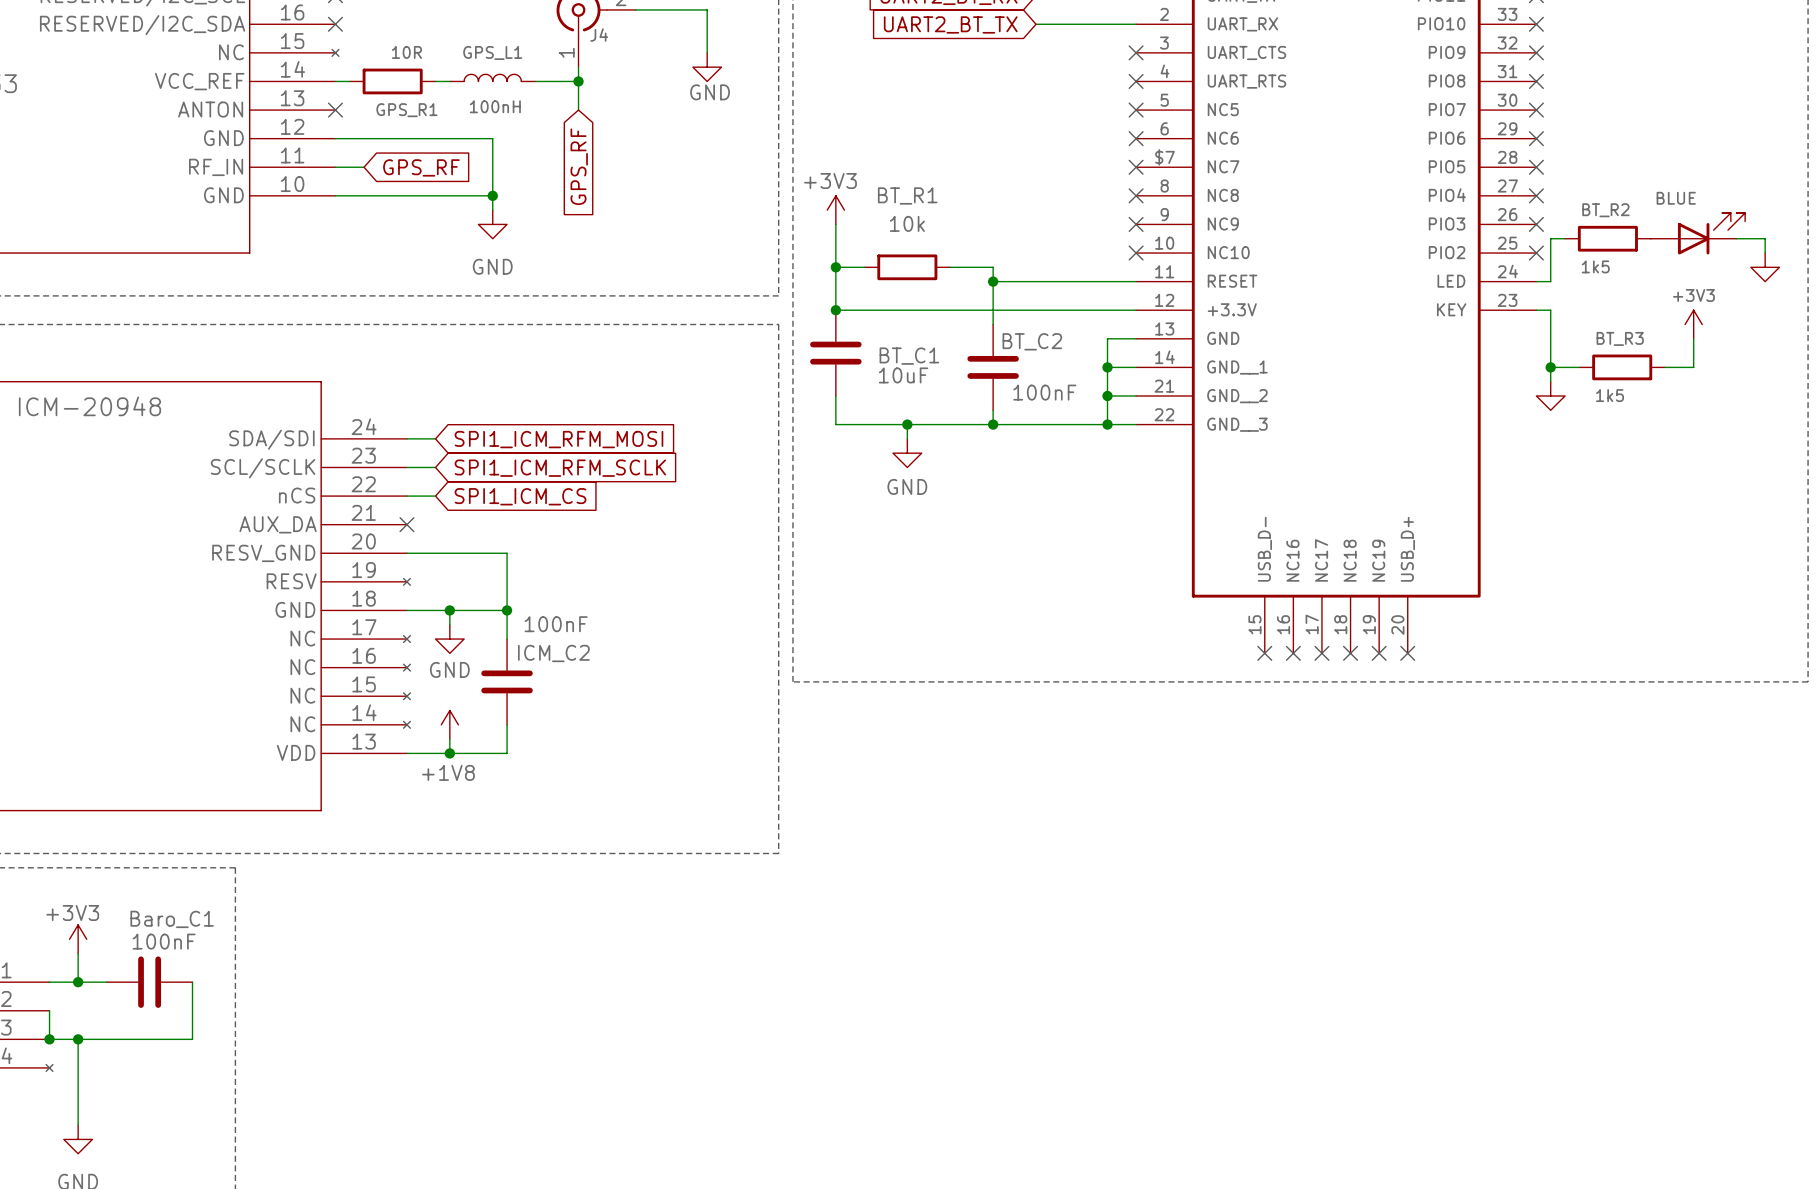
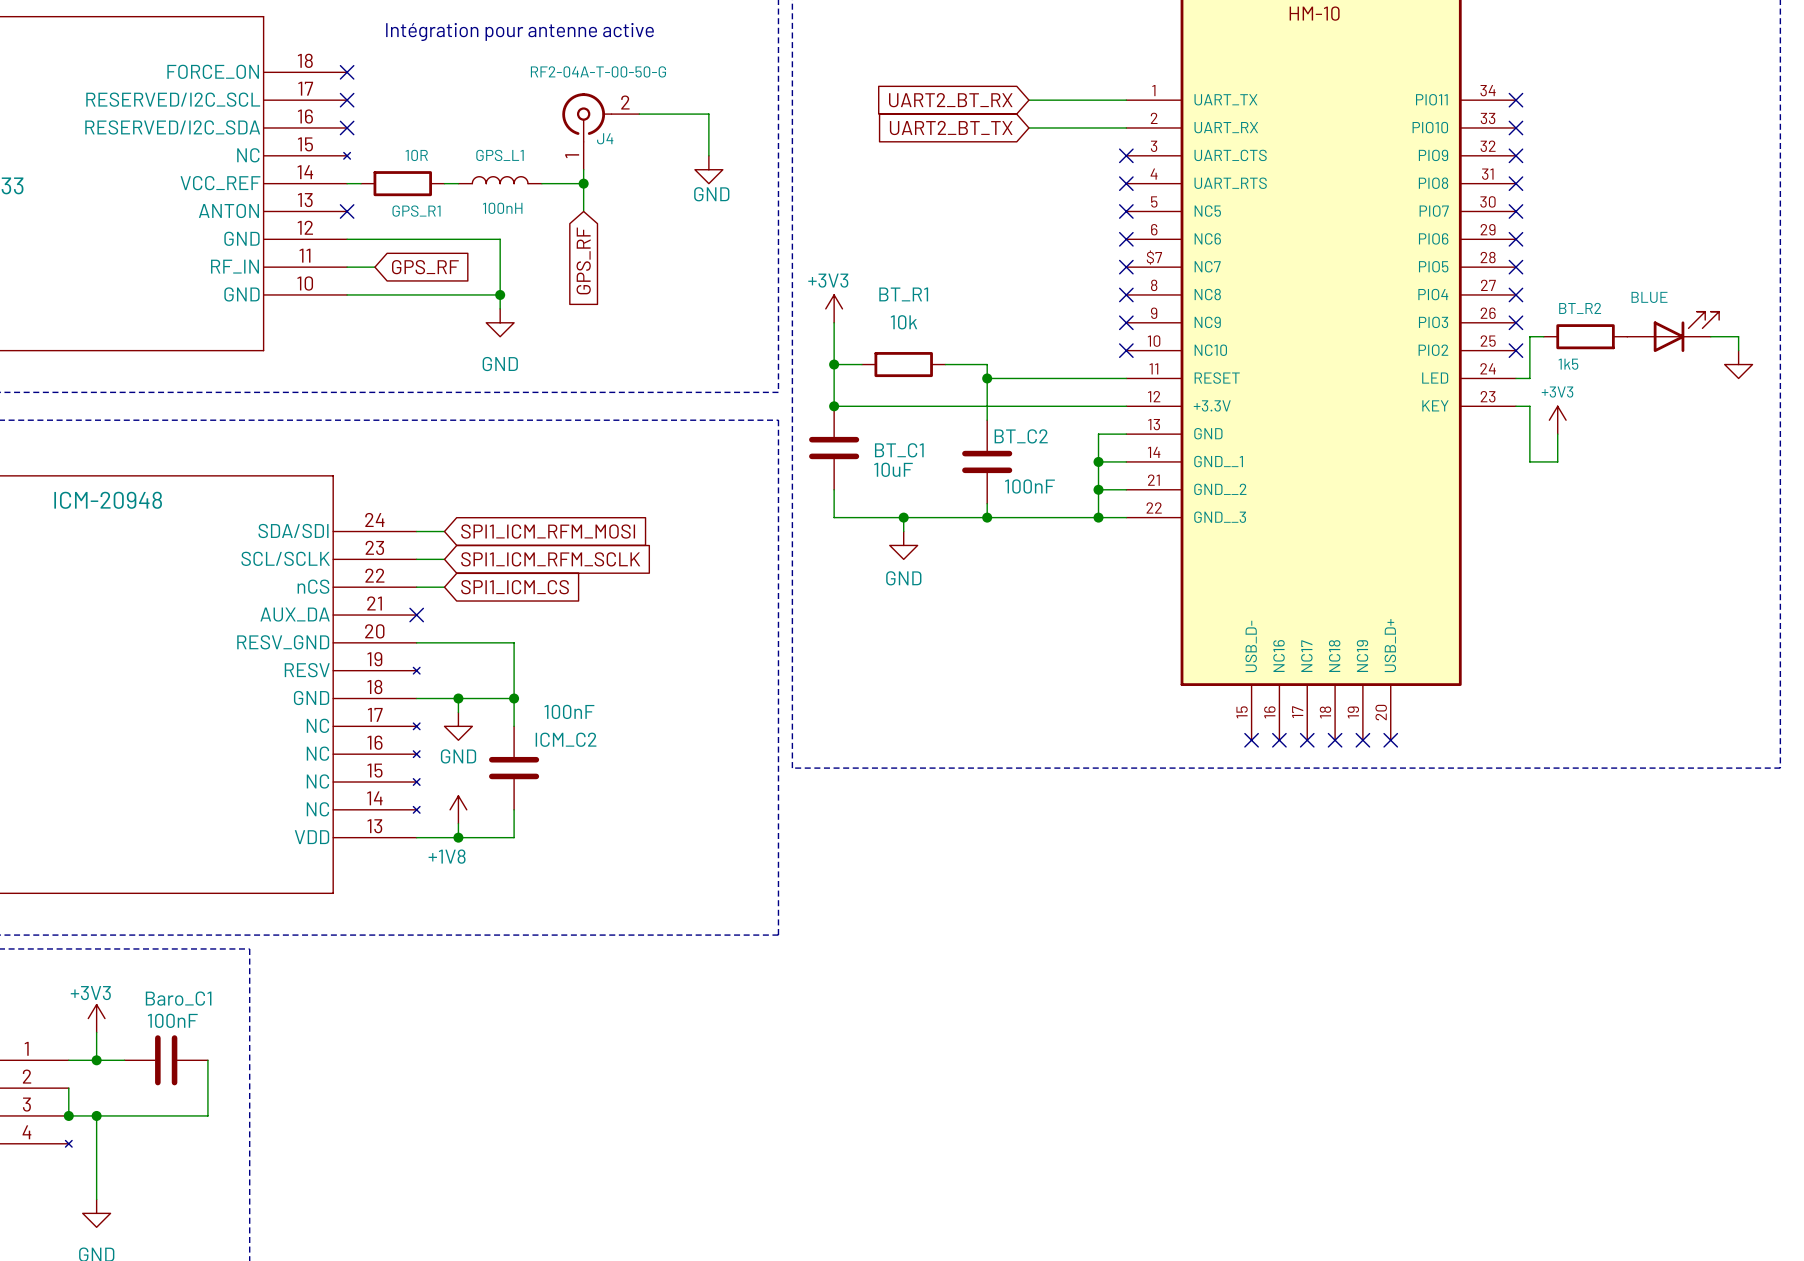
power symbol position: +3V3 (1693, 324) -> +3V3 (1557, 420)
wire: none -> (1557, 434) (1557, 461)
wire: (1693, 338) (1693, 367) (1665, 367) -> none
wire: (1550, 367) (1550, 381) -> none
junction: (1550, 367) -> none
BT_R3: 1k5 (1622, 367) -> none
power symbol: (1550, 395) -> none

